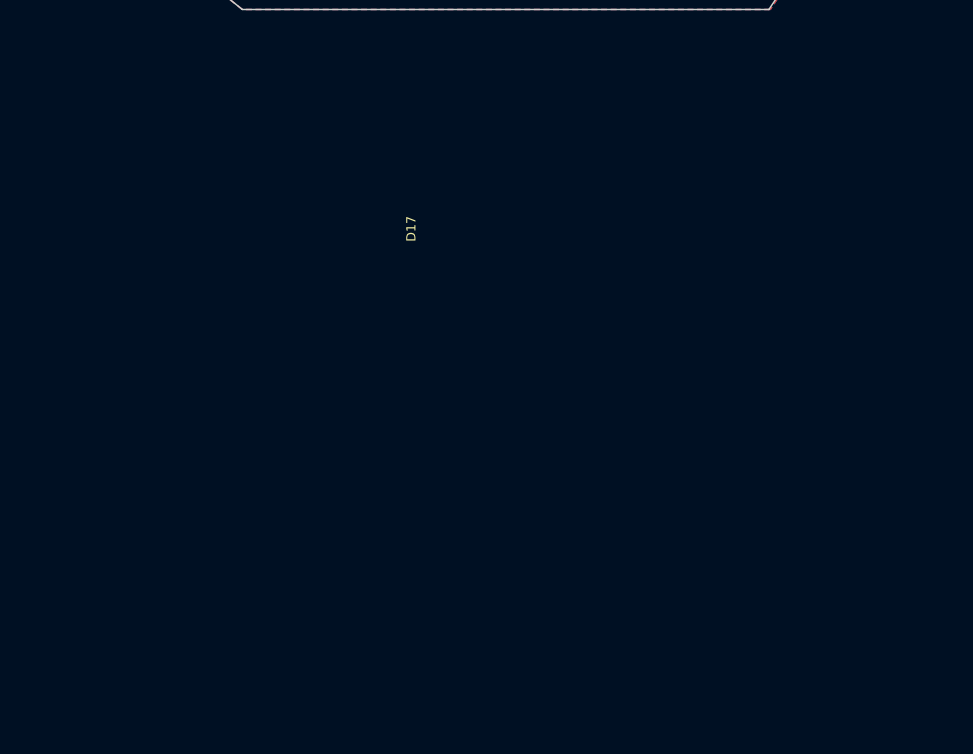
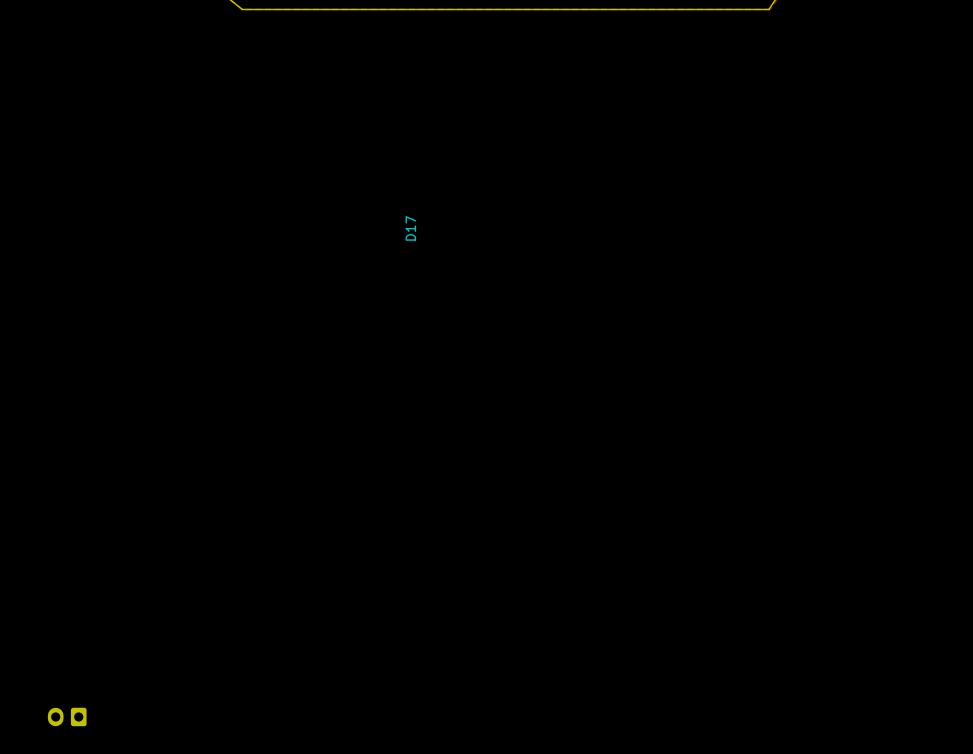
part: none -> (67, 716)

